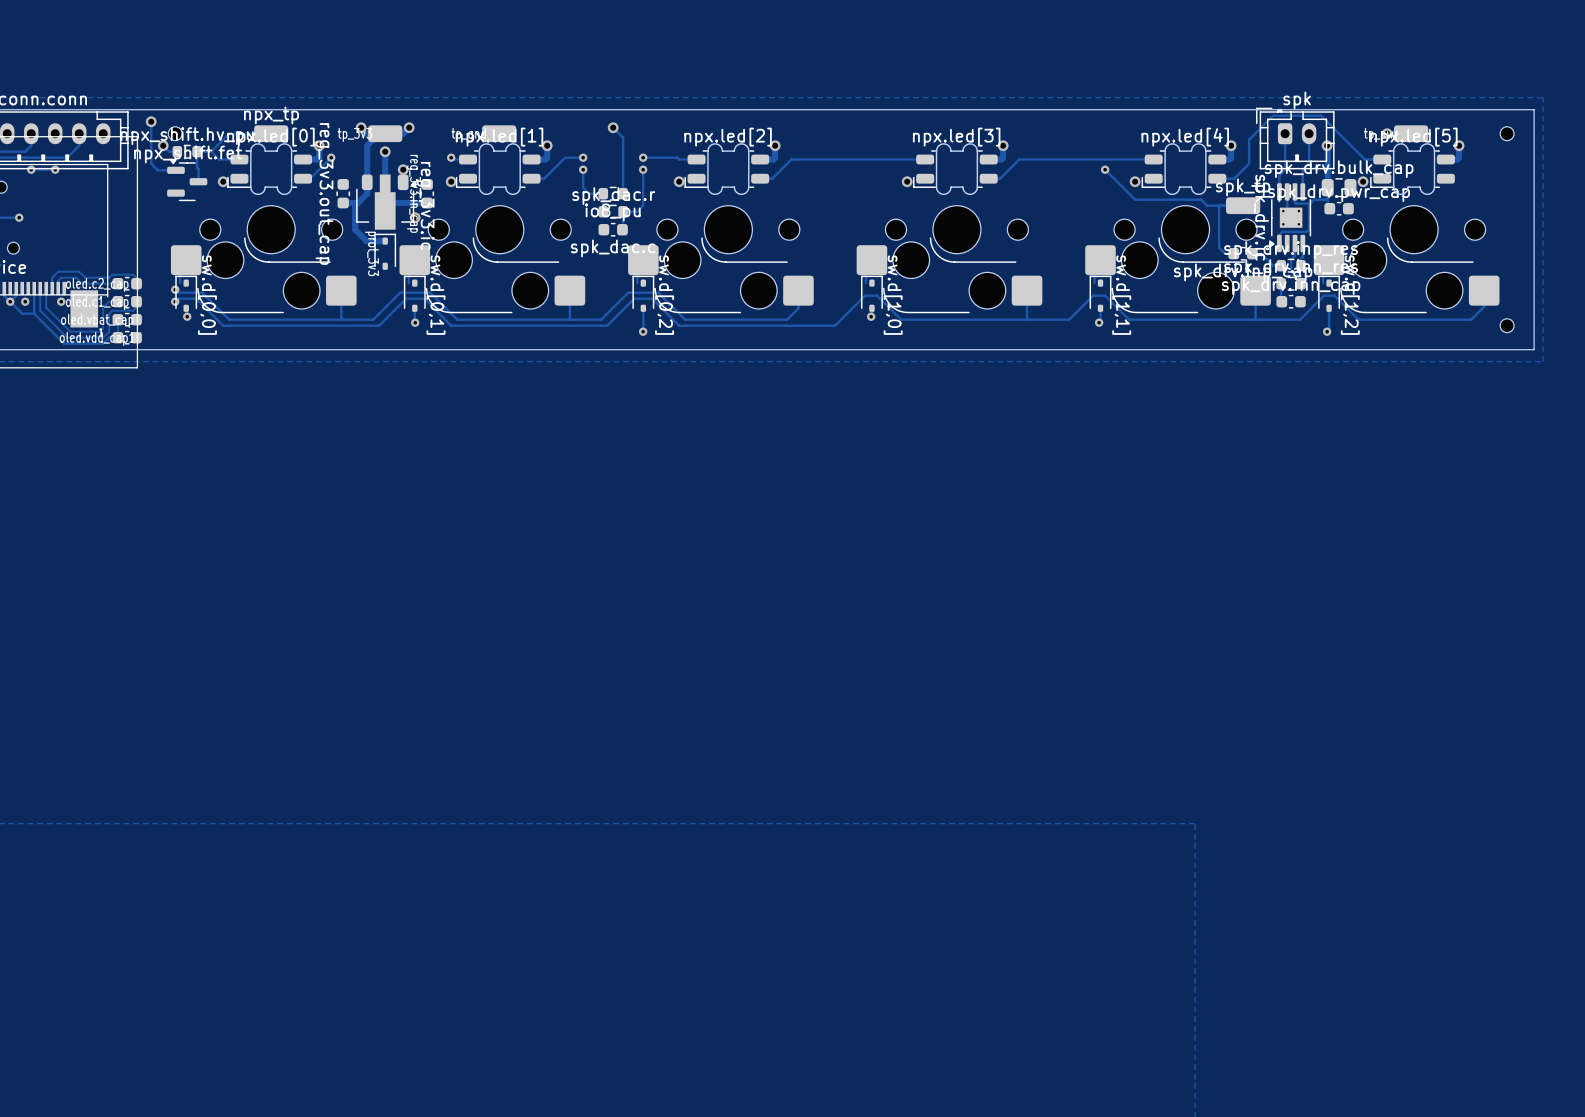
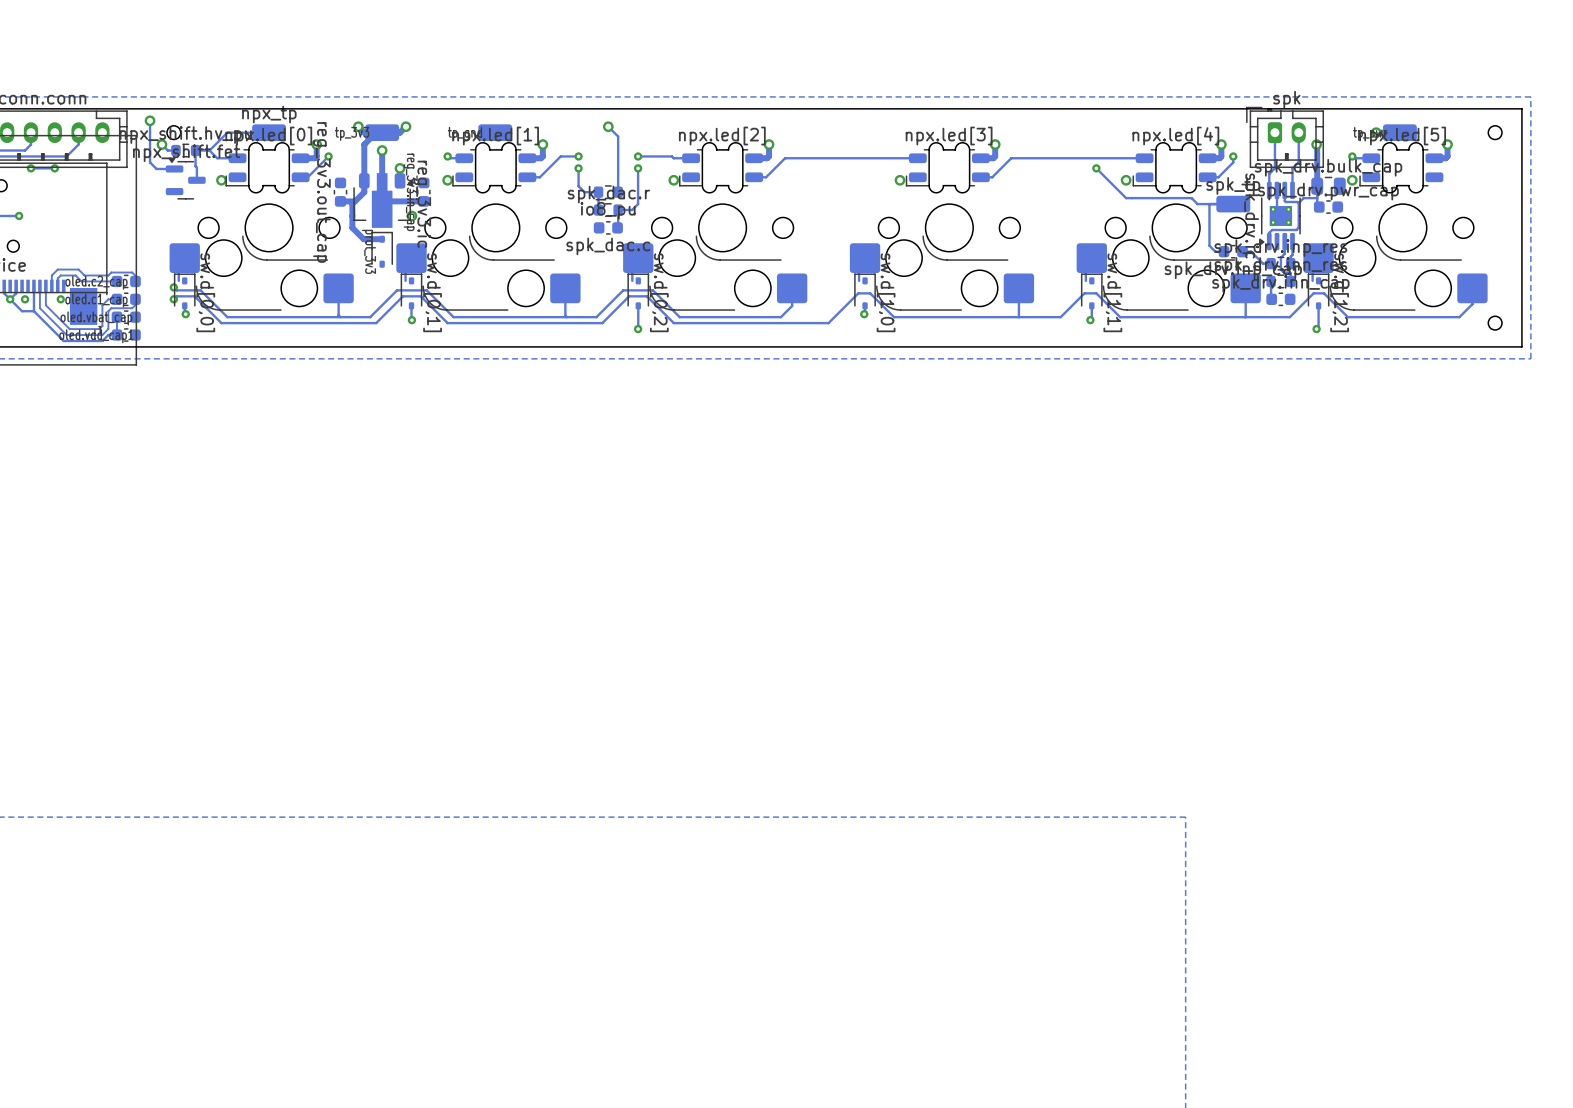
via: none -> (1233, 156)
track: (1363, 157) (1321, 115) (1273, 115) (1249, 139) (1249, 163) (1234, 178) (1228, 178) -> (1233, 156) (1233, 162) (1218, 177)
via: none -> (1352, 156)

